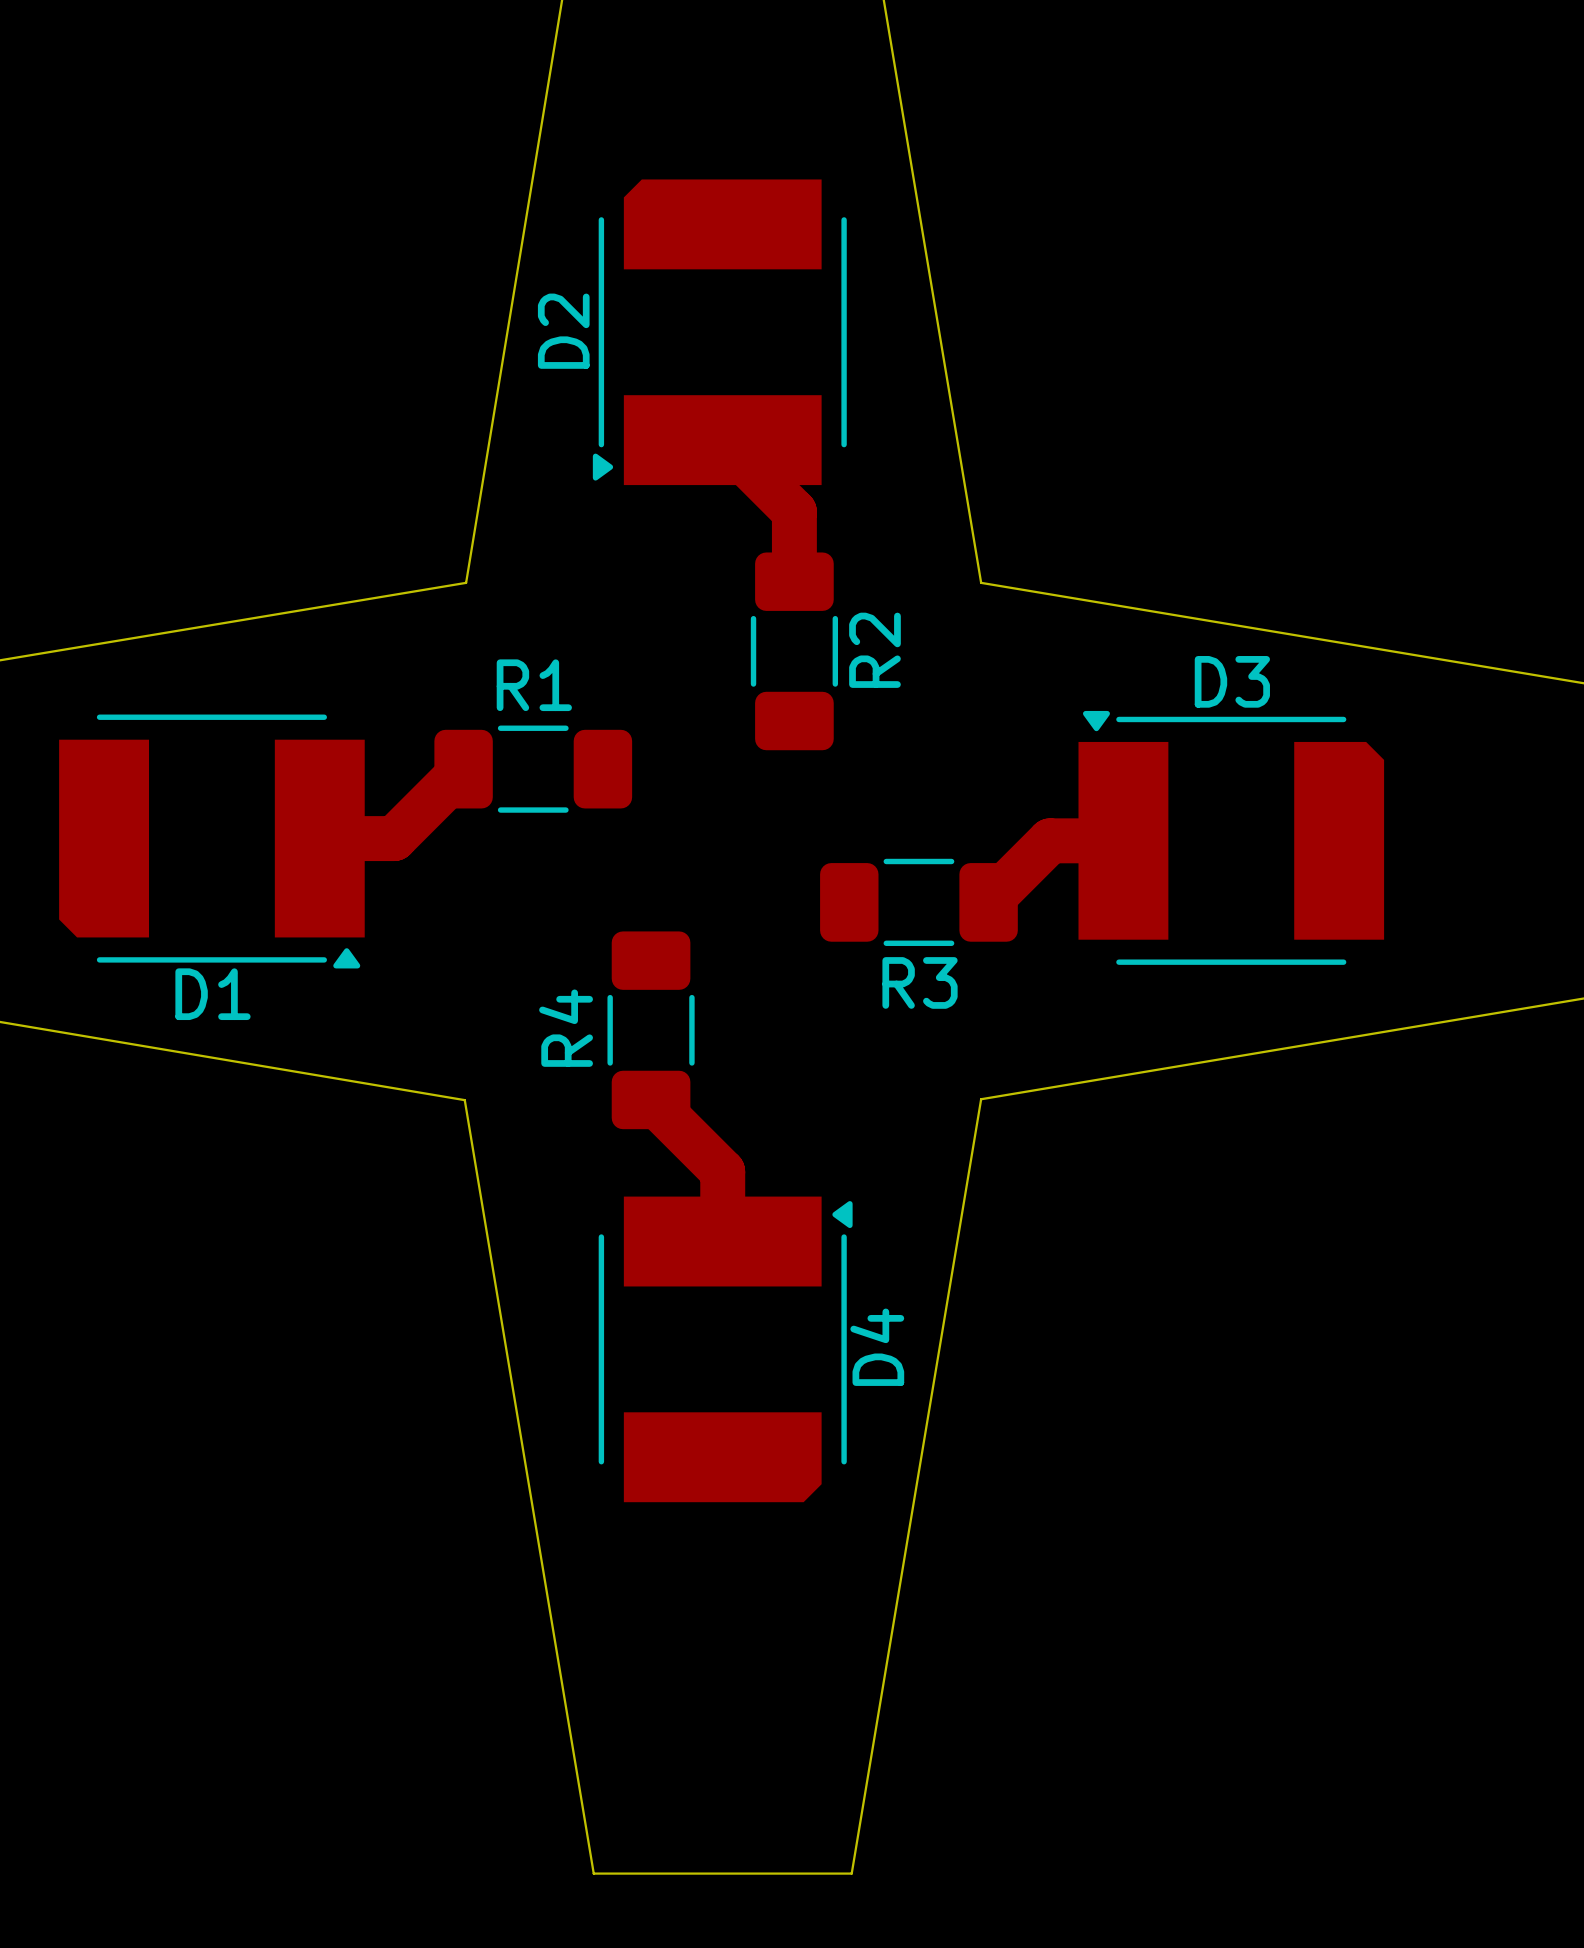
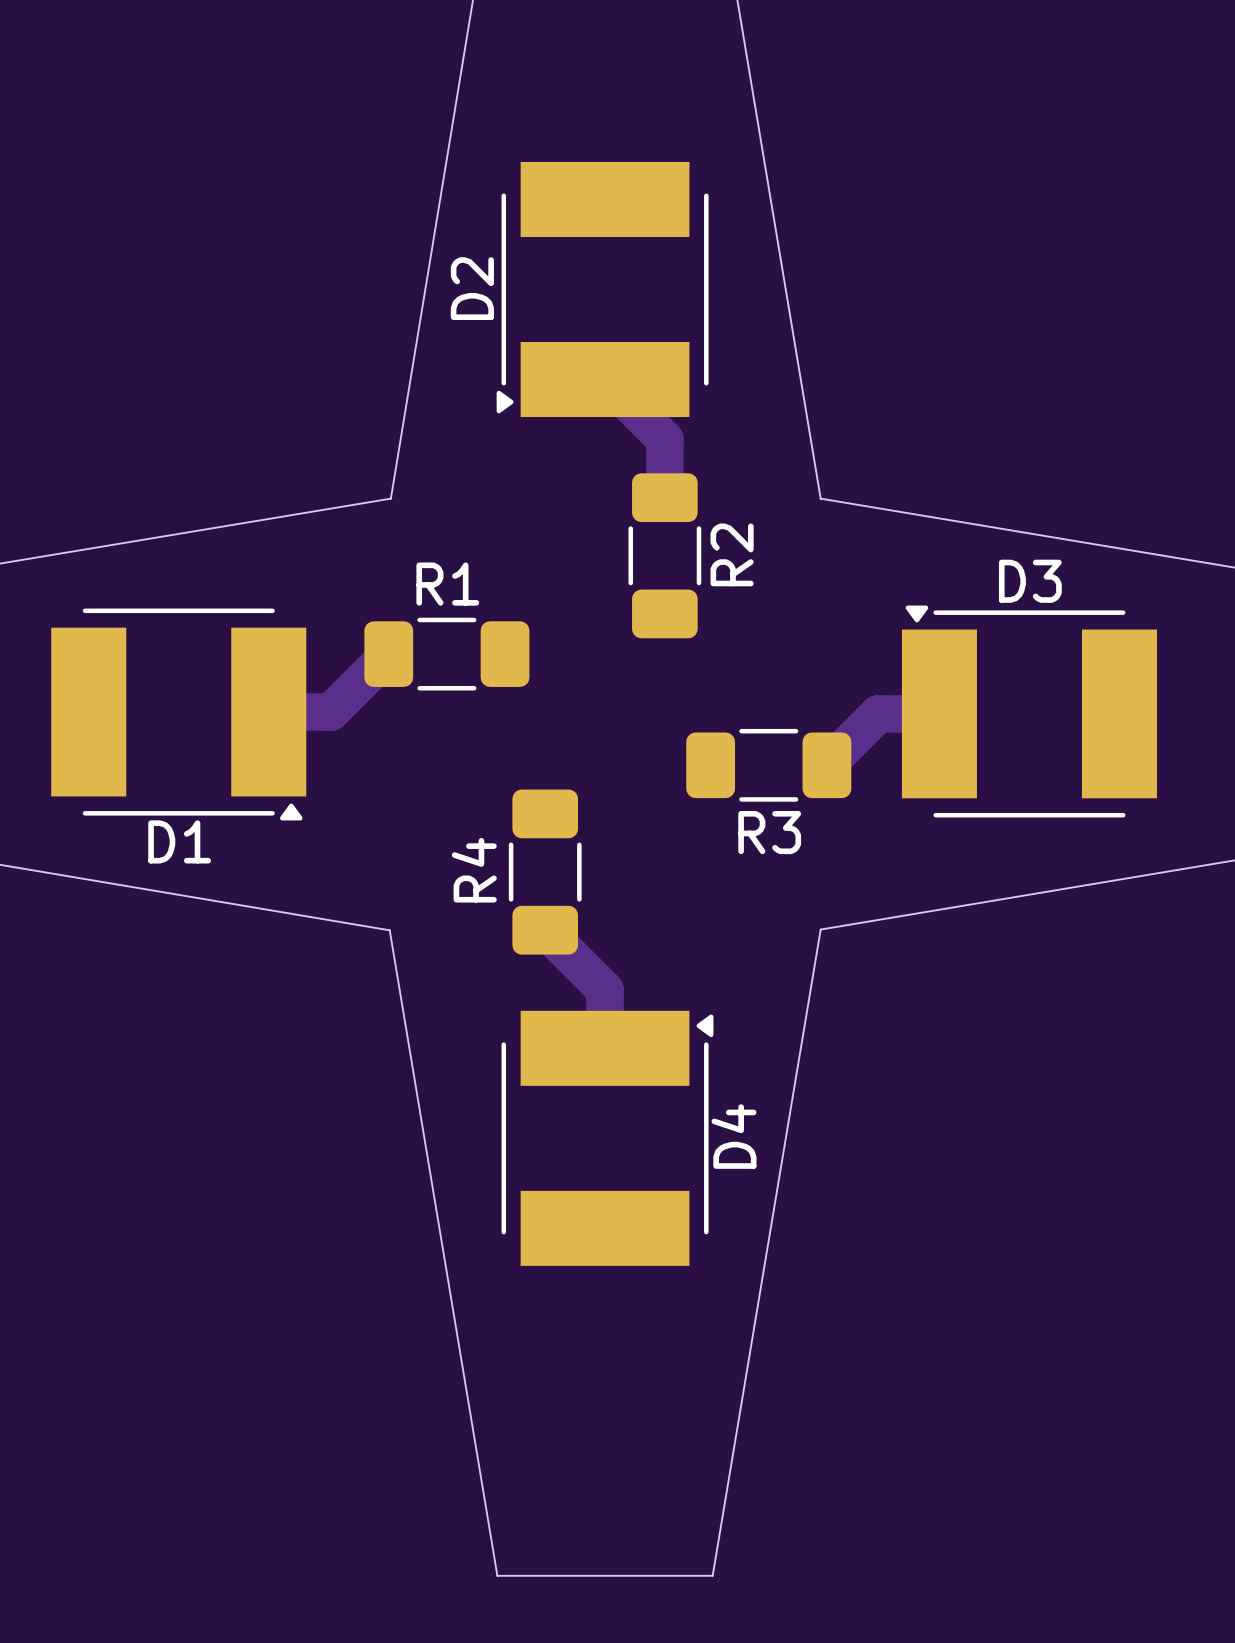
D2 footprint: [592, 179, 847, 486] -> [496, 161, 709, 418]
D3 footprint: [1078, 710, 1385, 965] -> [901, 605, 1157, 818]
D1 footprint: [59, 714, 365, 969] -> [51, 608, 307, 821]
D4 footprint: [598, 1196, 853, 1503] -> [501, 1010, 714, 1266]

